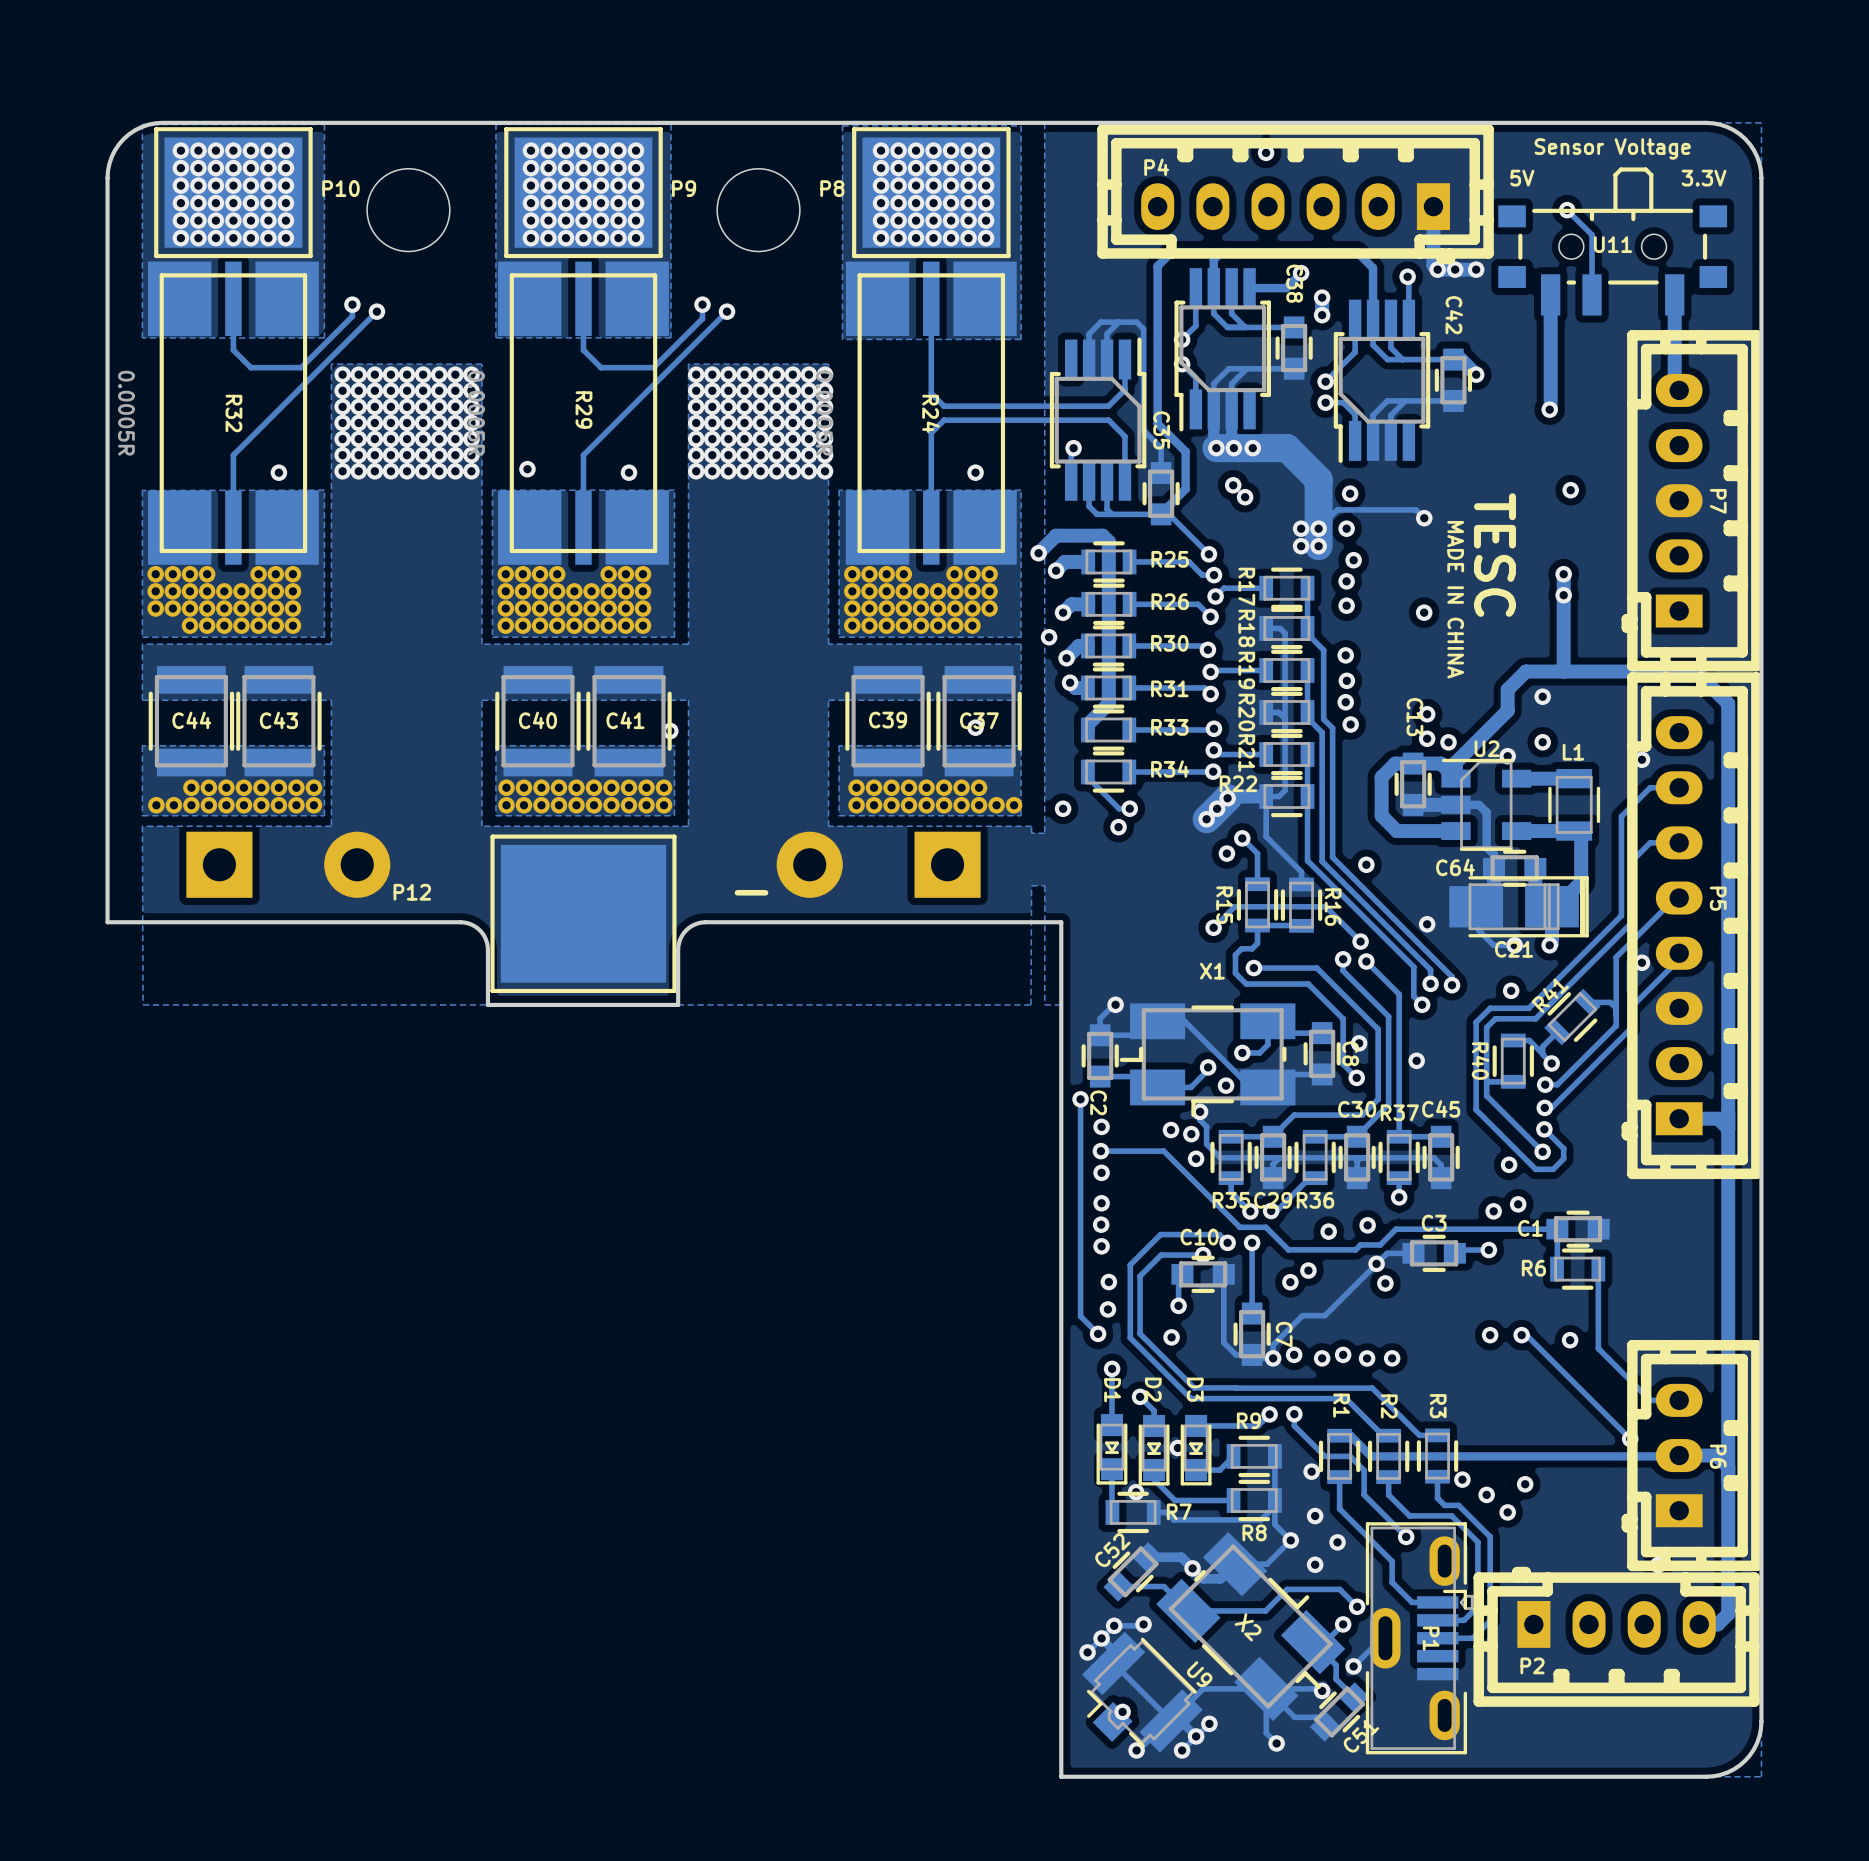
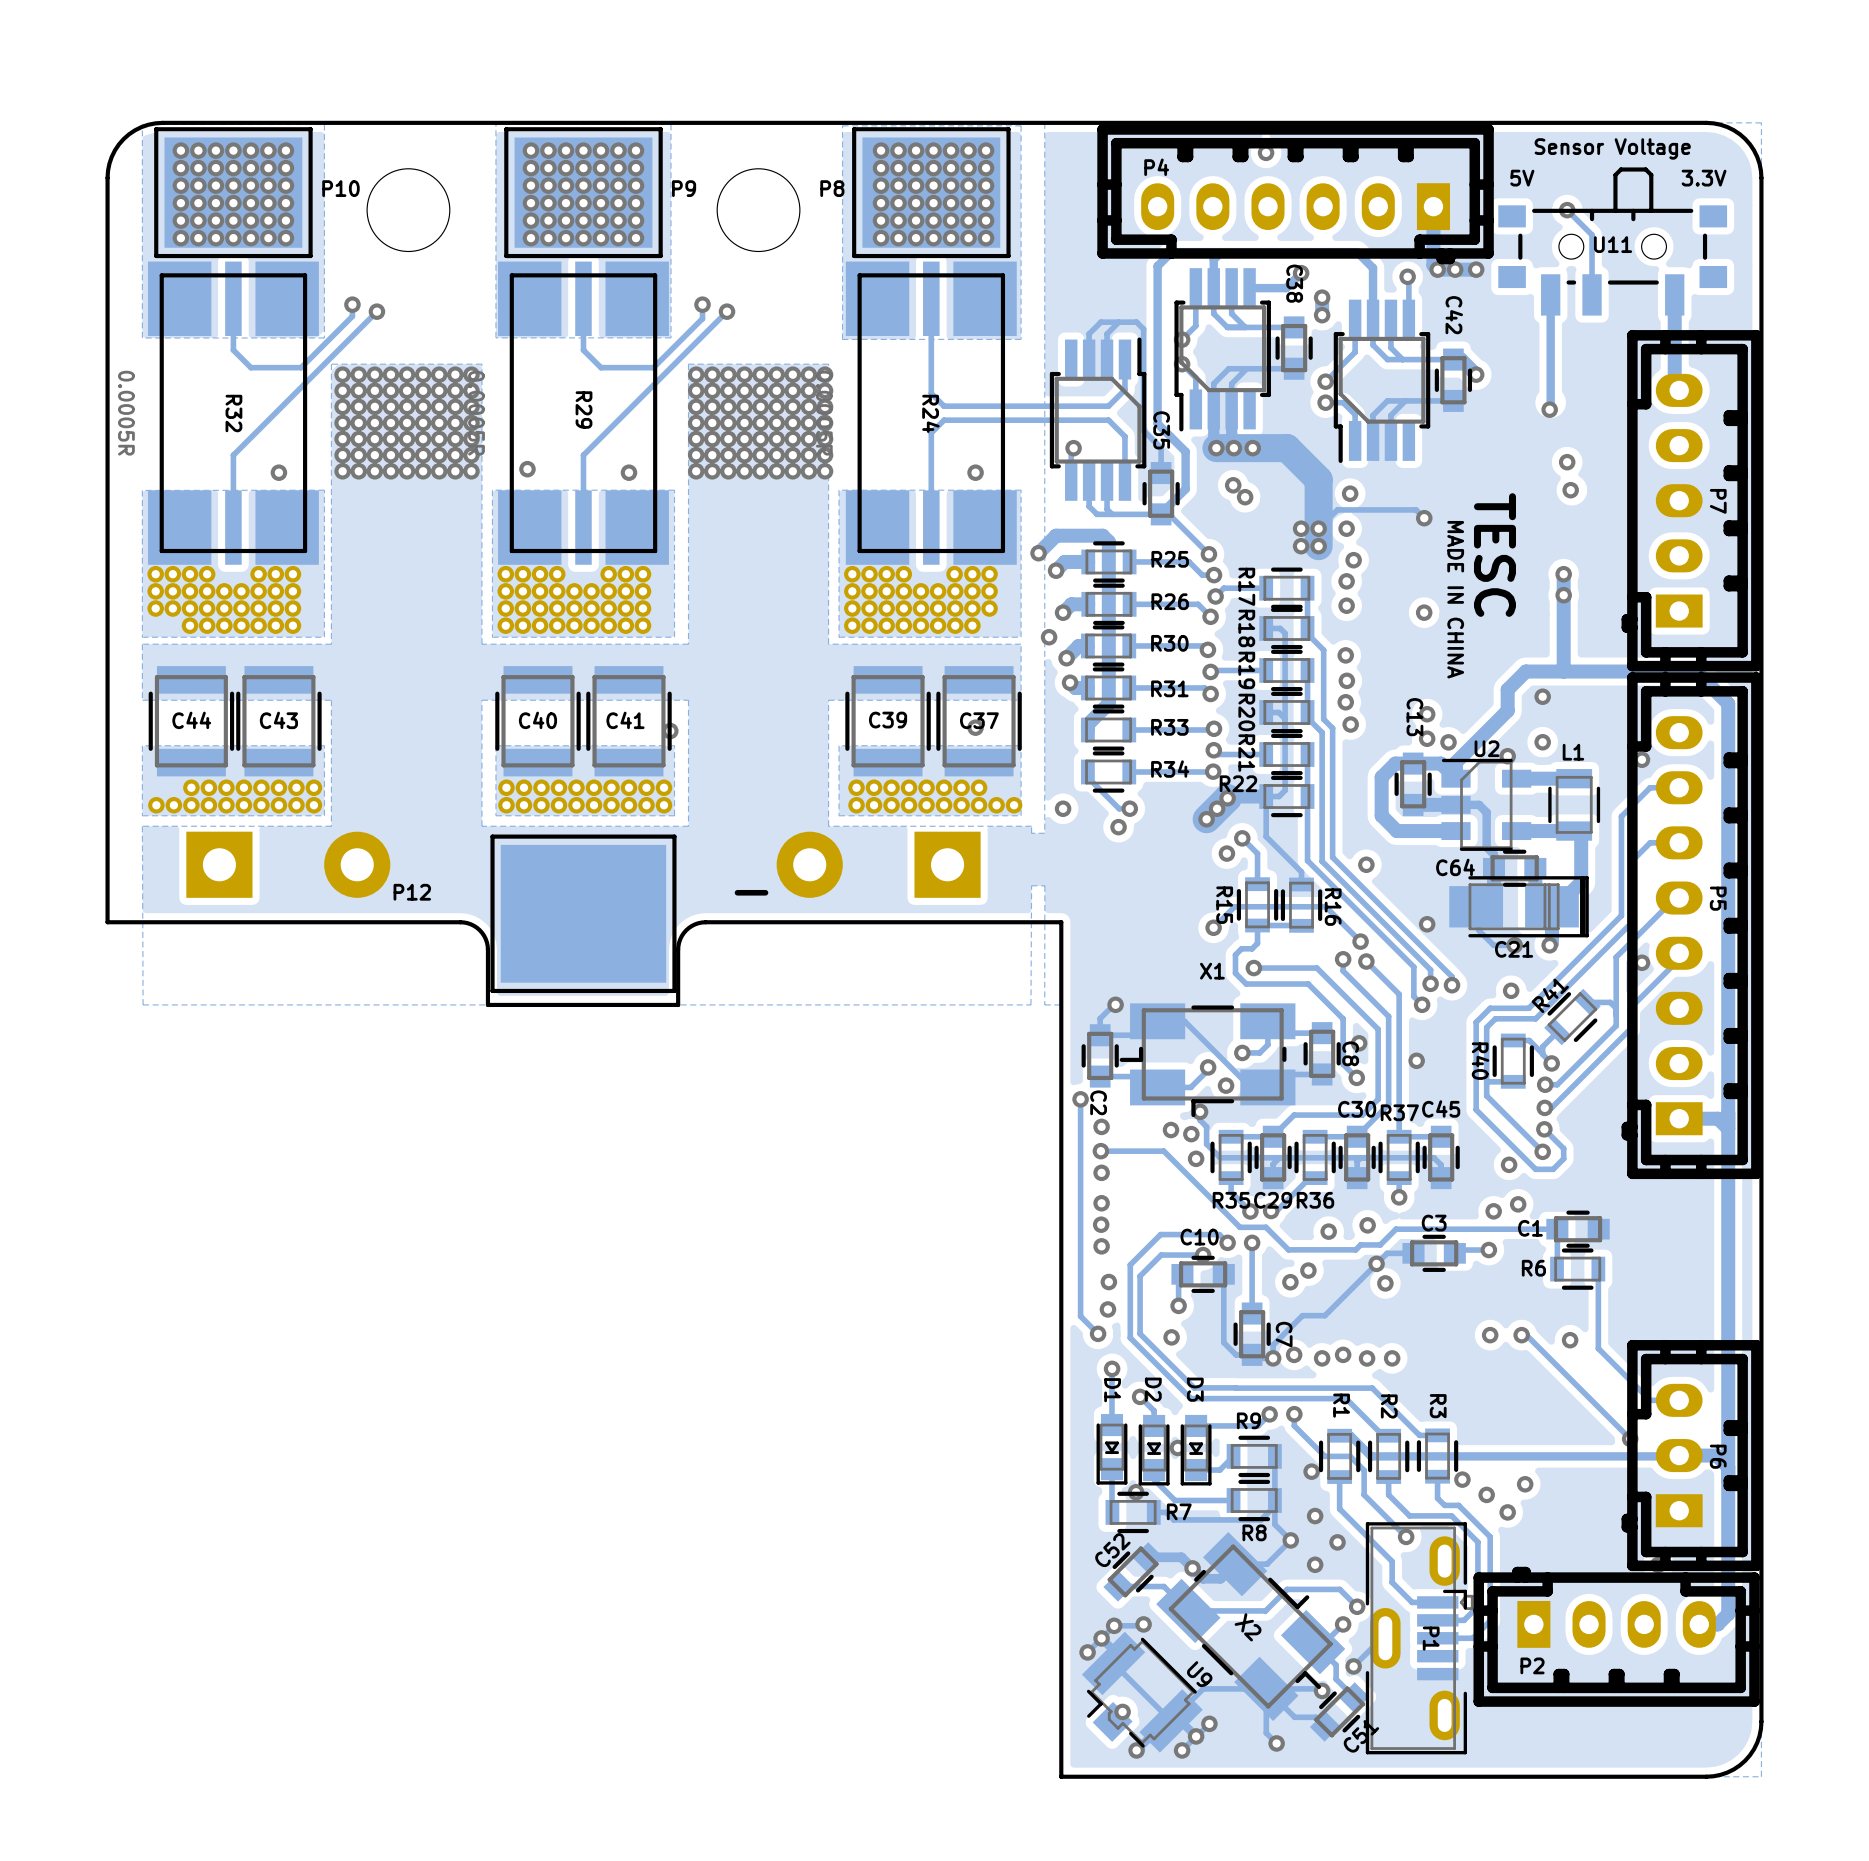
track width: thick (1550, 294) (1550, 402) -> thin (1550, 294) (1550, 402)
via: none -> (1567, 462)

